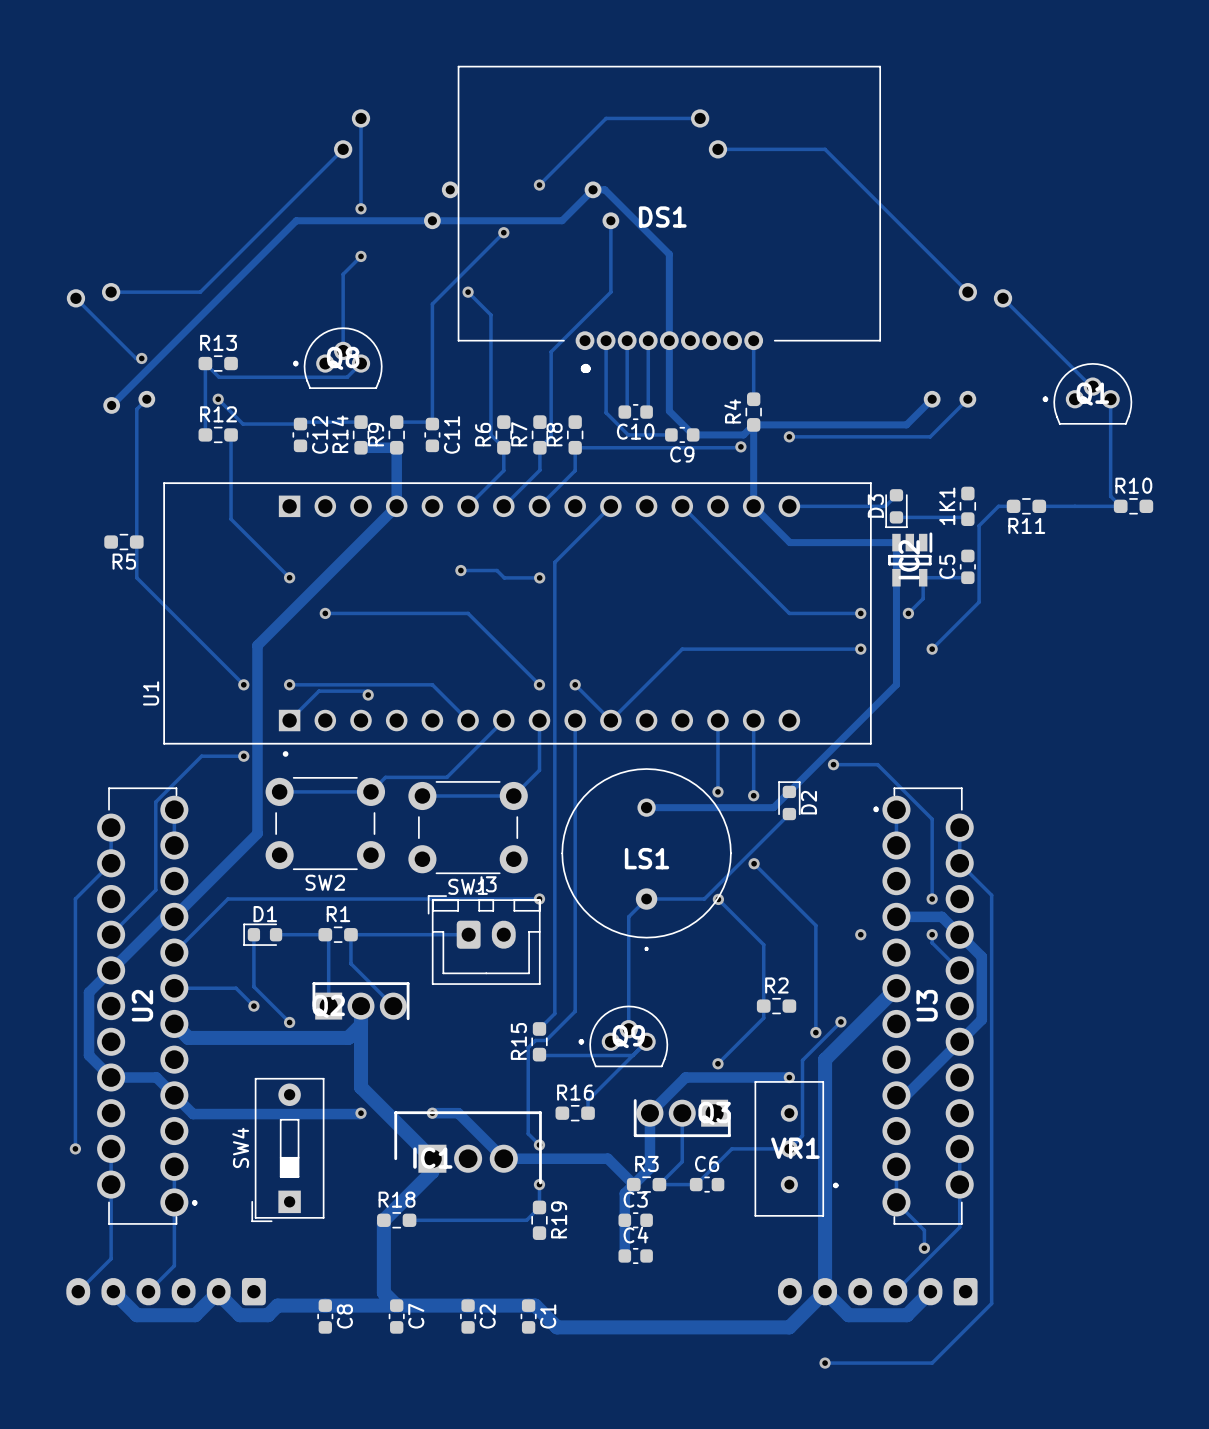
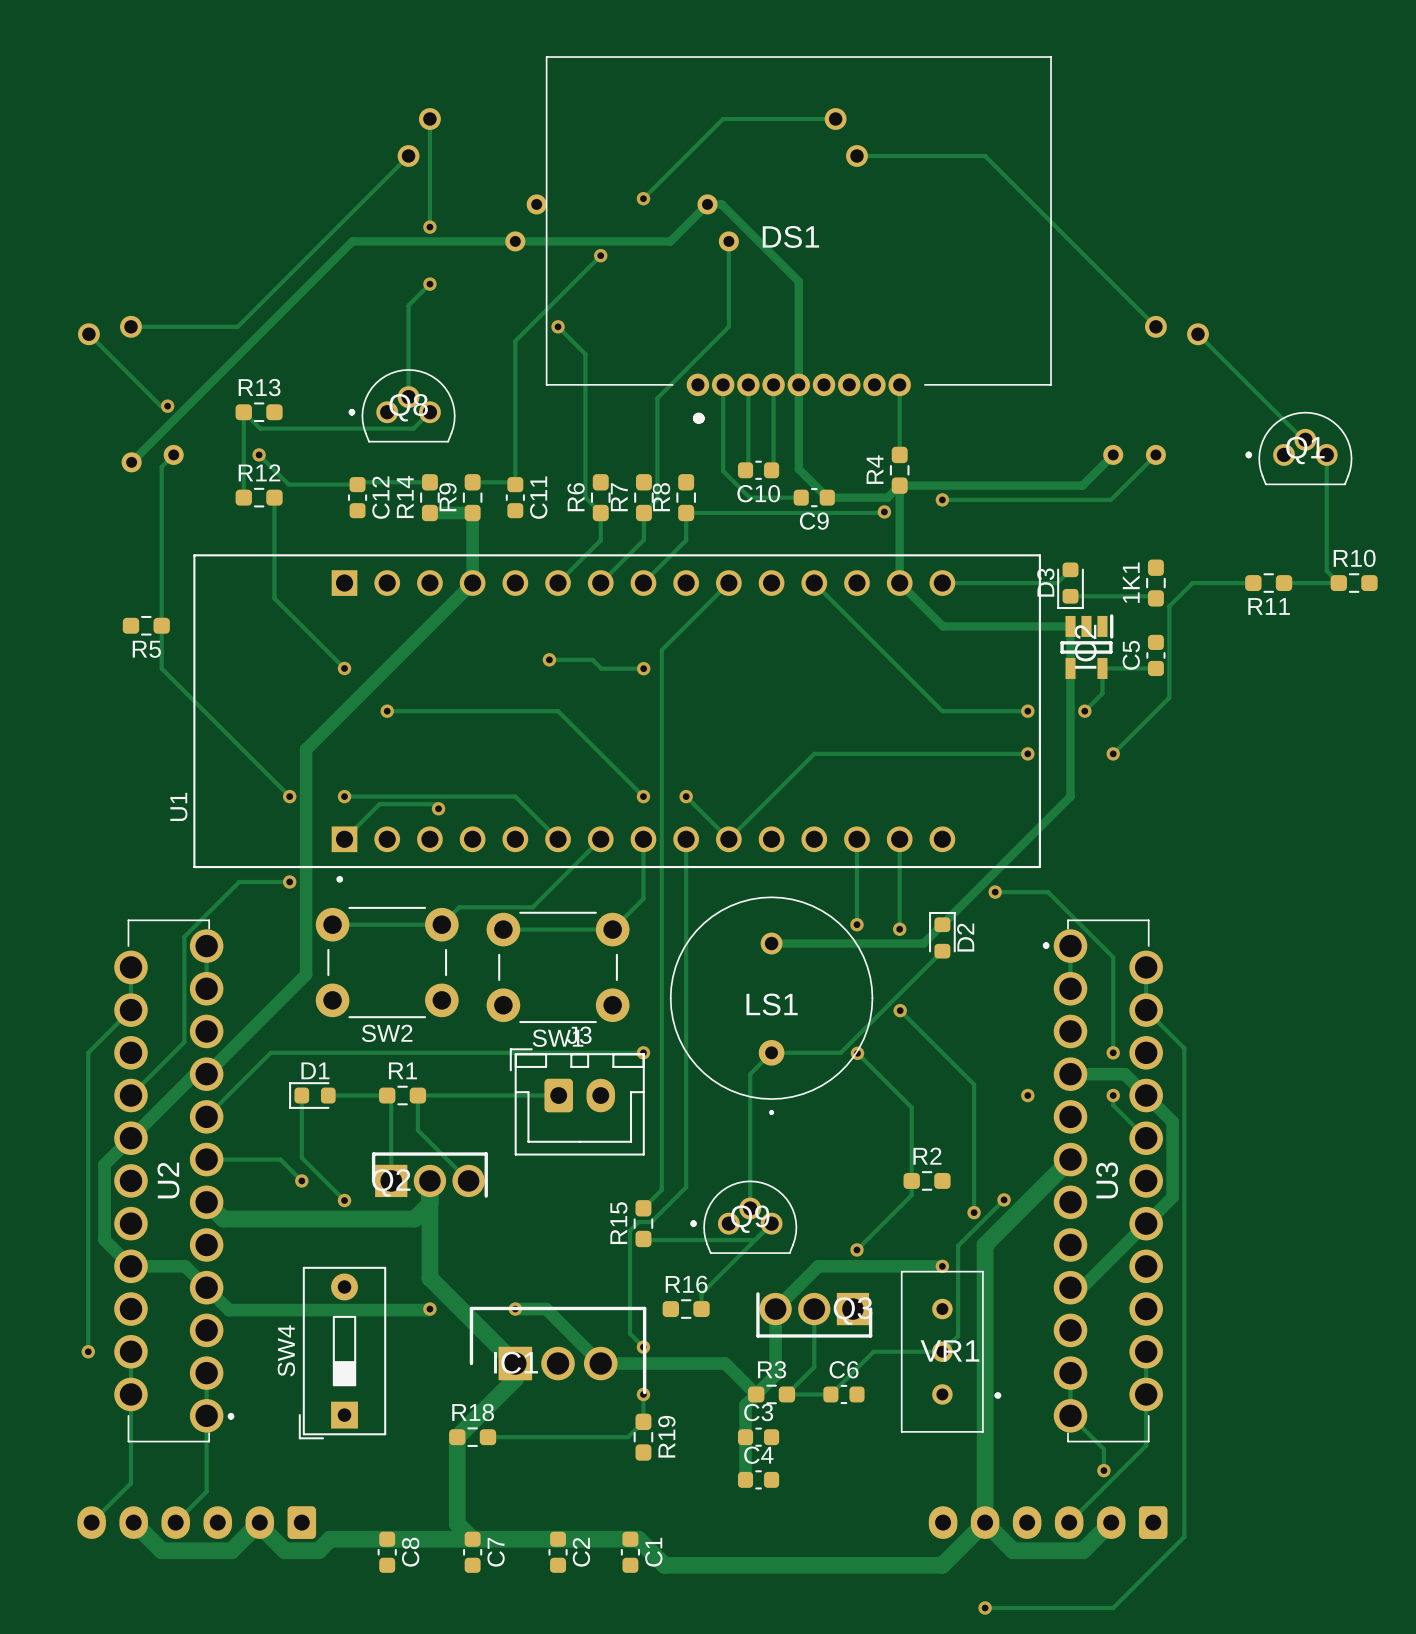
R11 position: (1026, 506) -> (1268, 583)
track: (1049, 506) (1074, 506) -> (1210, 583) (1241, 583)

